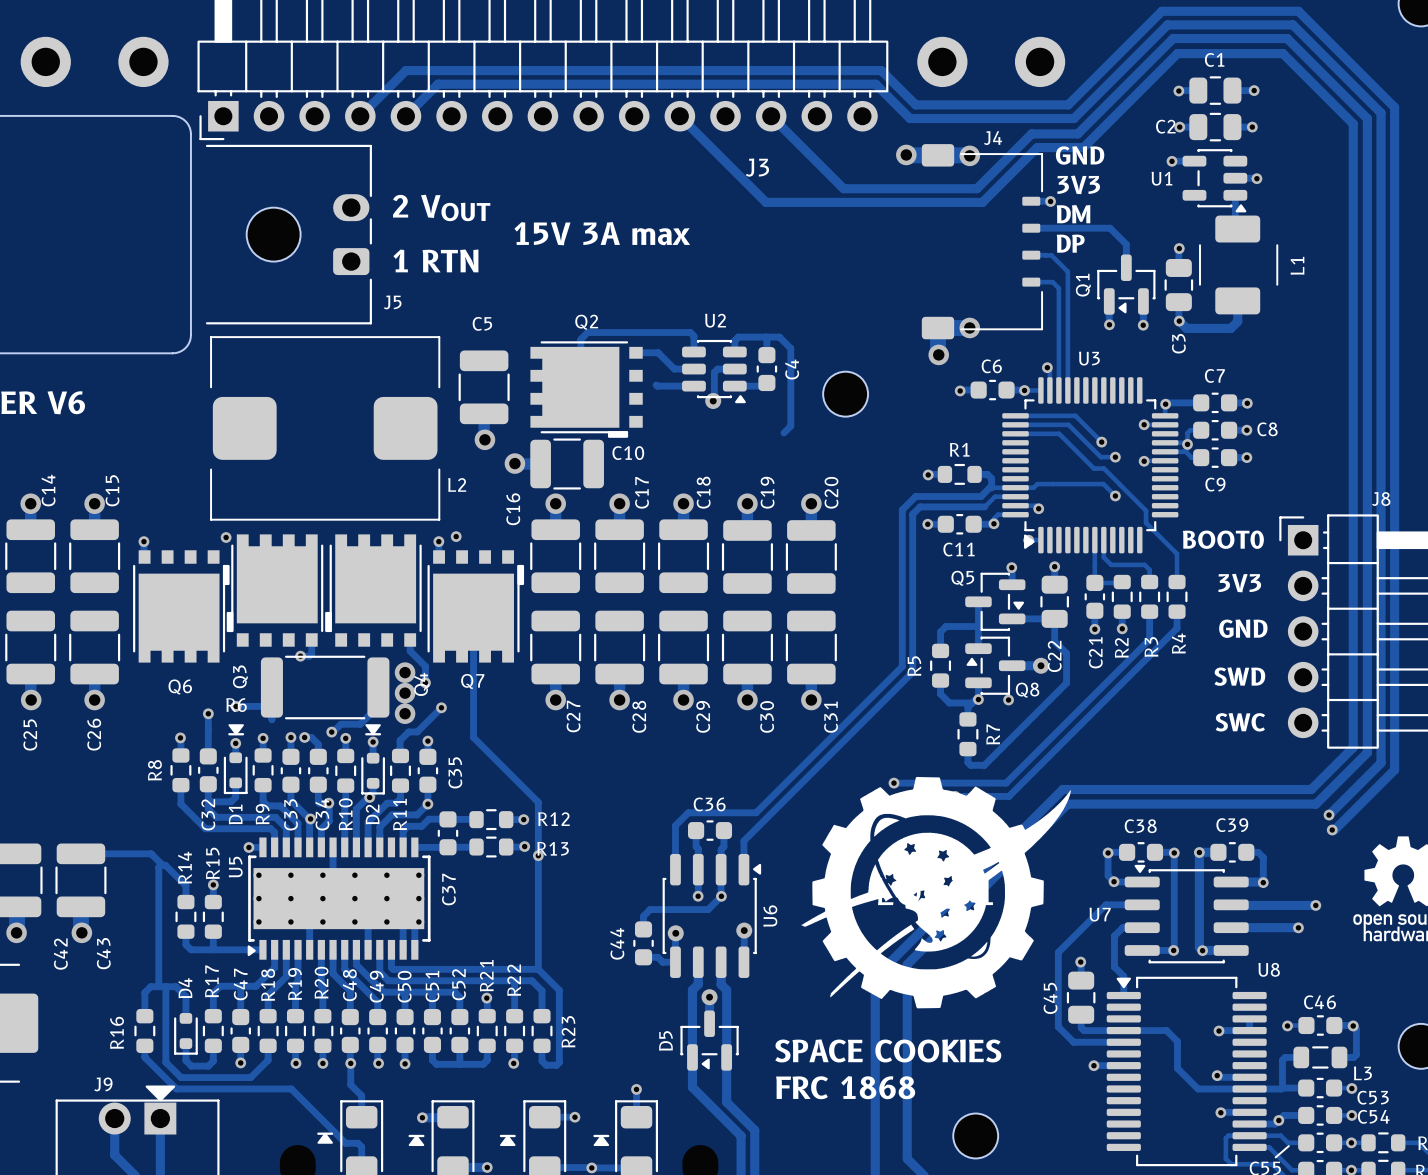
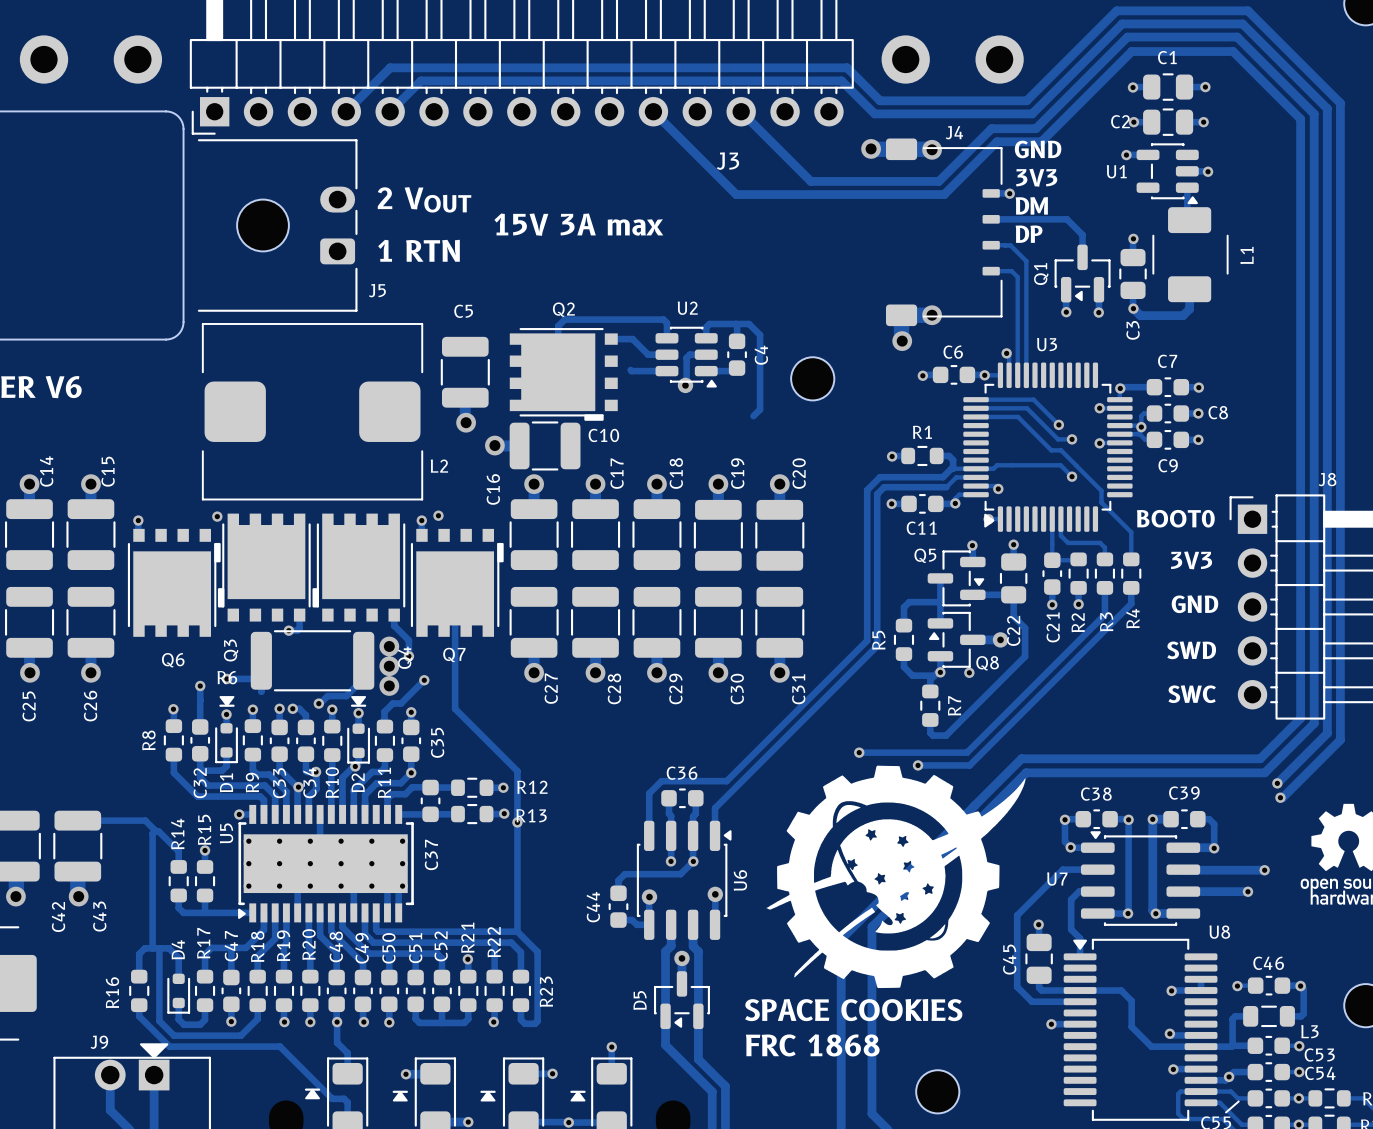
drawing: none -> [766, 765, 1026, 989]
part: (936, 892) -> none

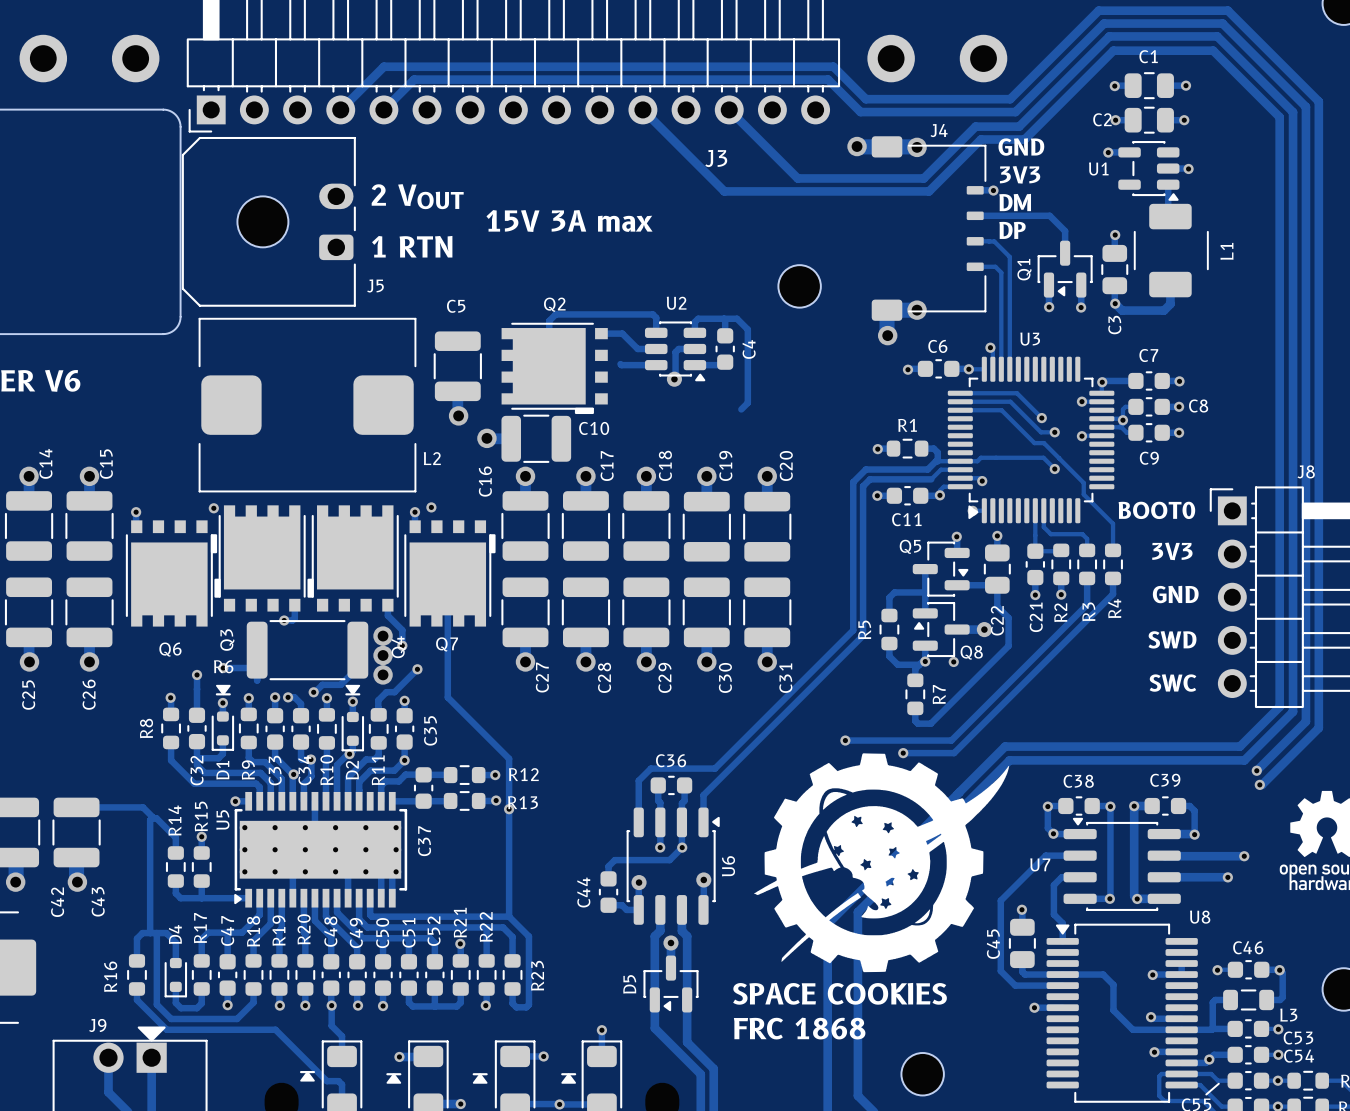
J5 footprint: [197, 139, 358, 312] -> [181, 136, 356, 307]
part position: (812, 378) -> (799, 286)

